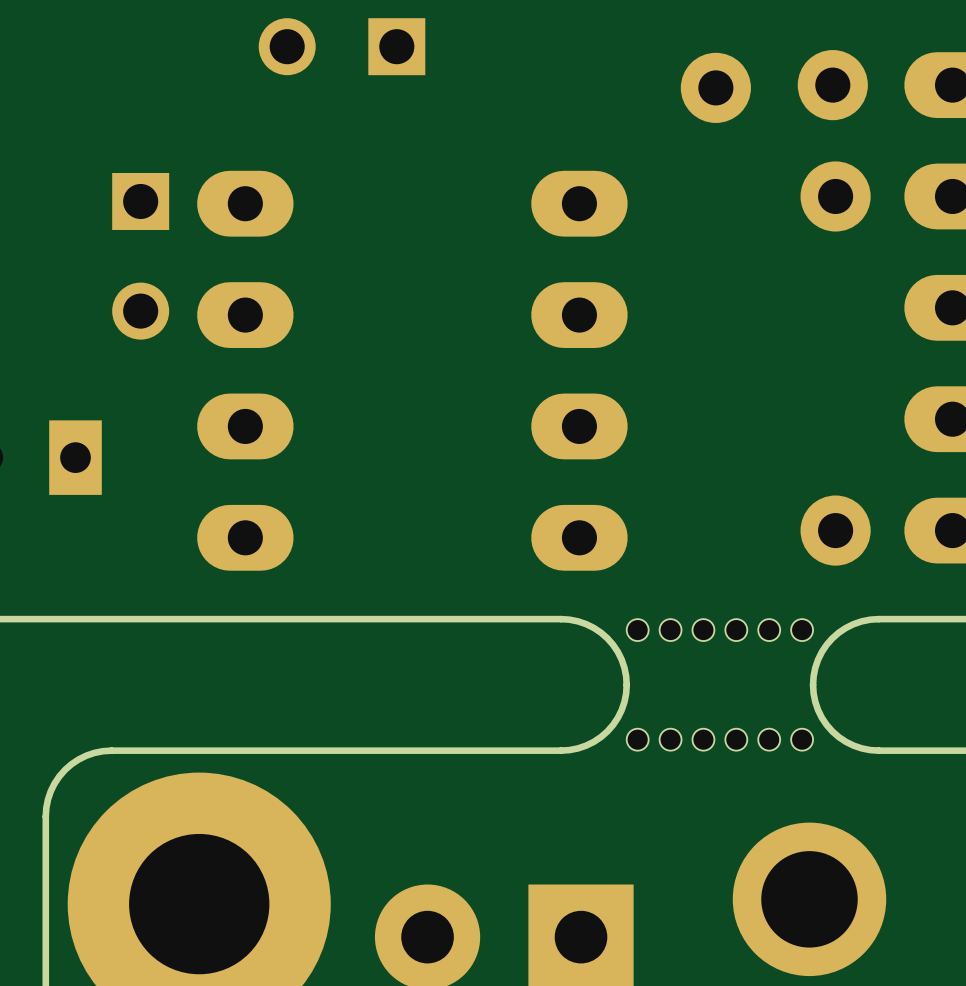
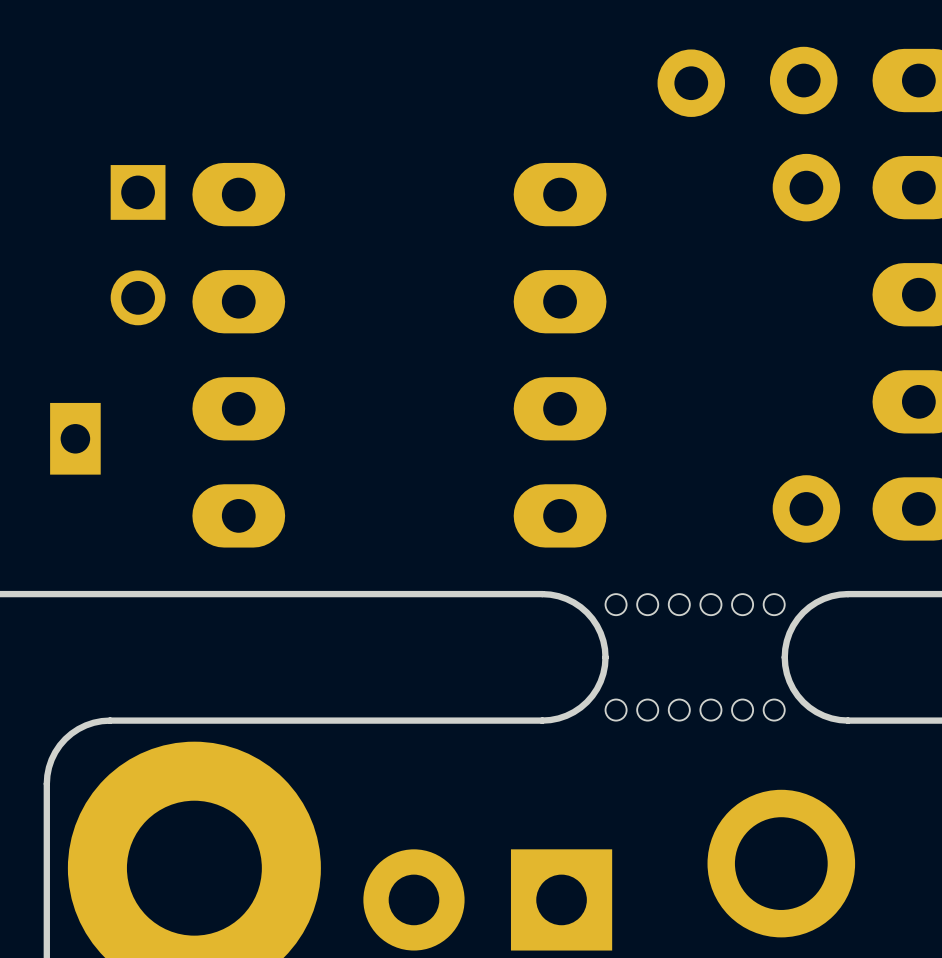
part: (342, 46) -> none

